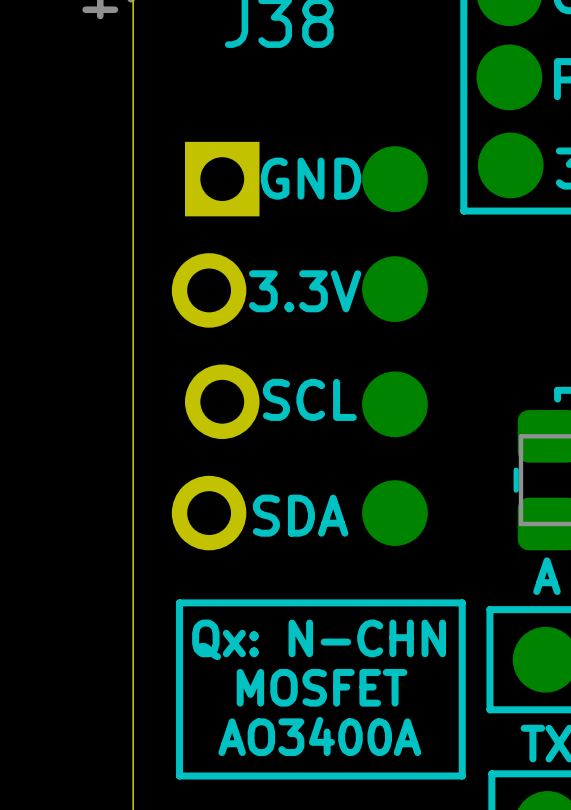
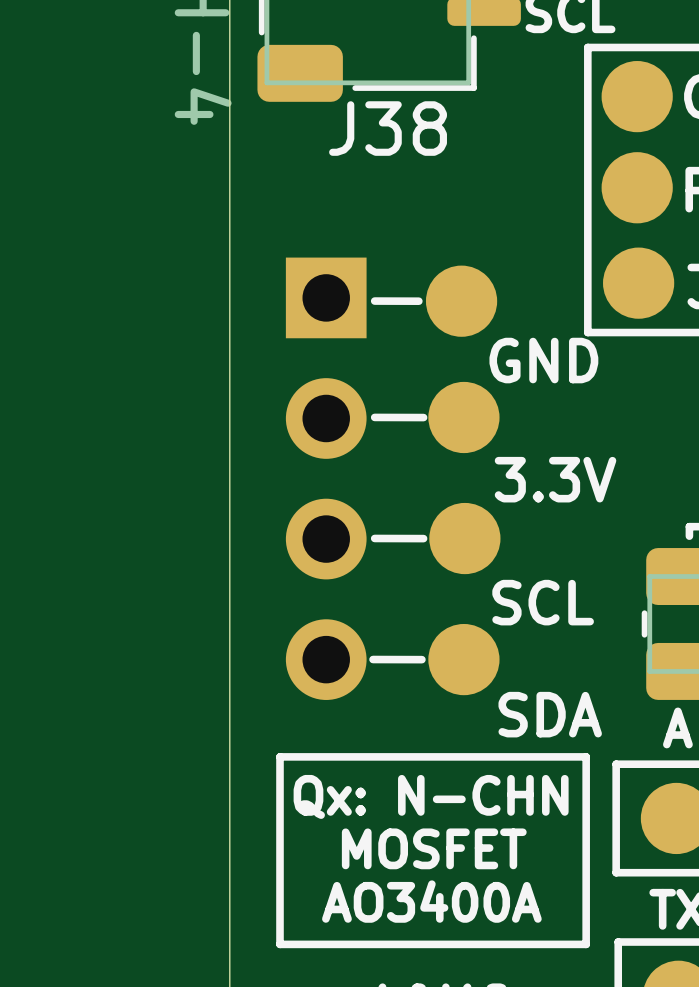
part footprint: [171, 141, 260, 551] -> [285, 257, 367, 700]
text position: GND (311, 178) -> GND (543, 360)
part position: (394, 179) -> (461, 301)
line: none -> (418, 301) (374, 301)
line: none -> (423, 417) (374, 417)
part position: (394, 289) -> (463, 417)
text position: 3.3V (305, 291) -> 3.3V (555, 479)
text position: SCL (309, 399) -> SCL (543, 602)
line: none -> (423, 538) (374, 538)
part position: (394, 404) -> (464, 538)
line: none -> (421, 659) (373, 659)
part position: (394, 513) -> (463, 659)
text position: SDA (300, 515) -> SDA (550, 714)

